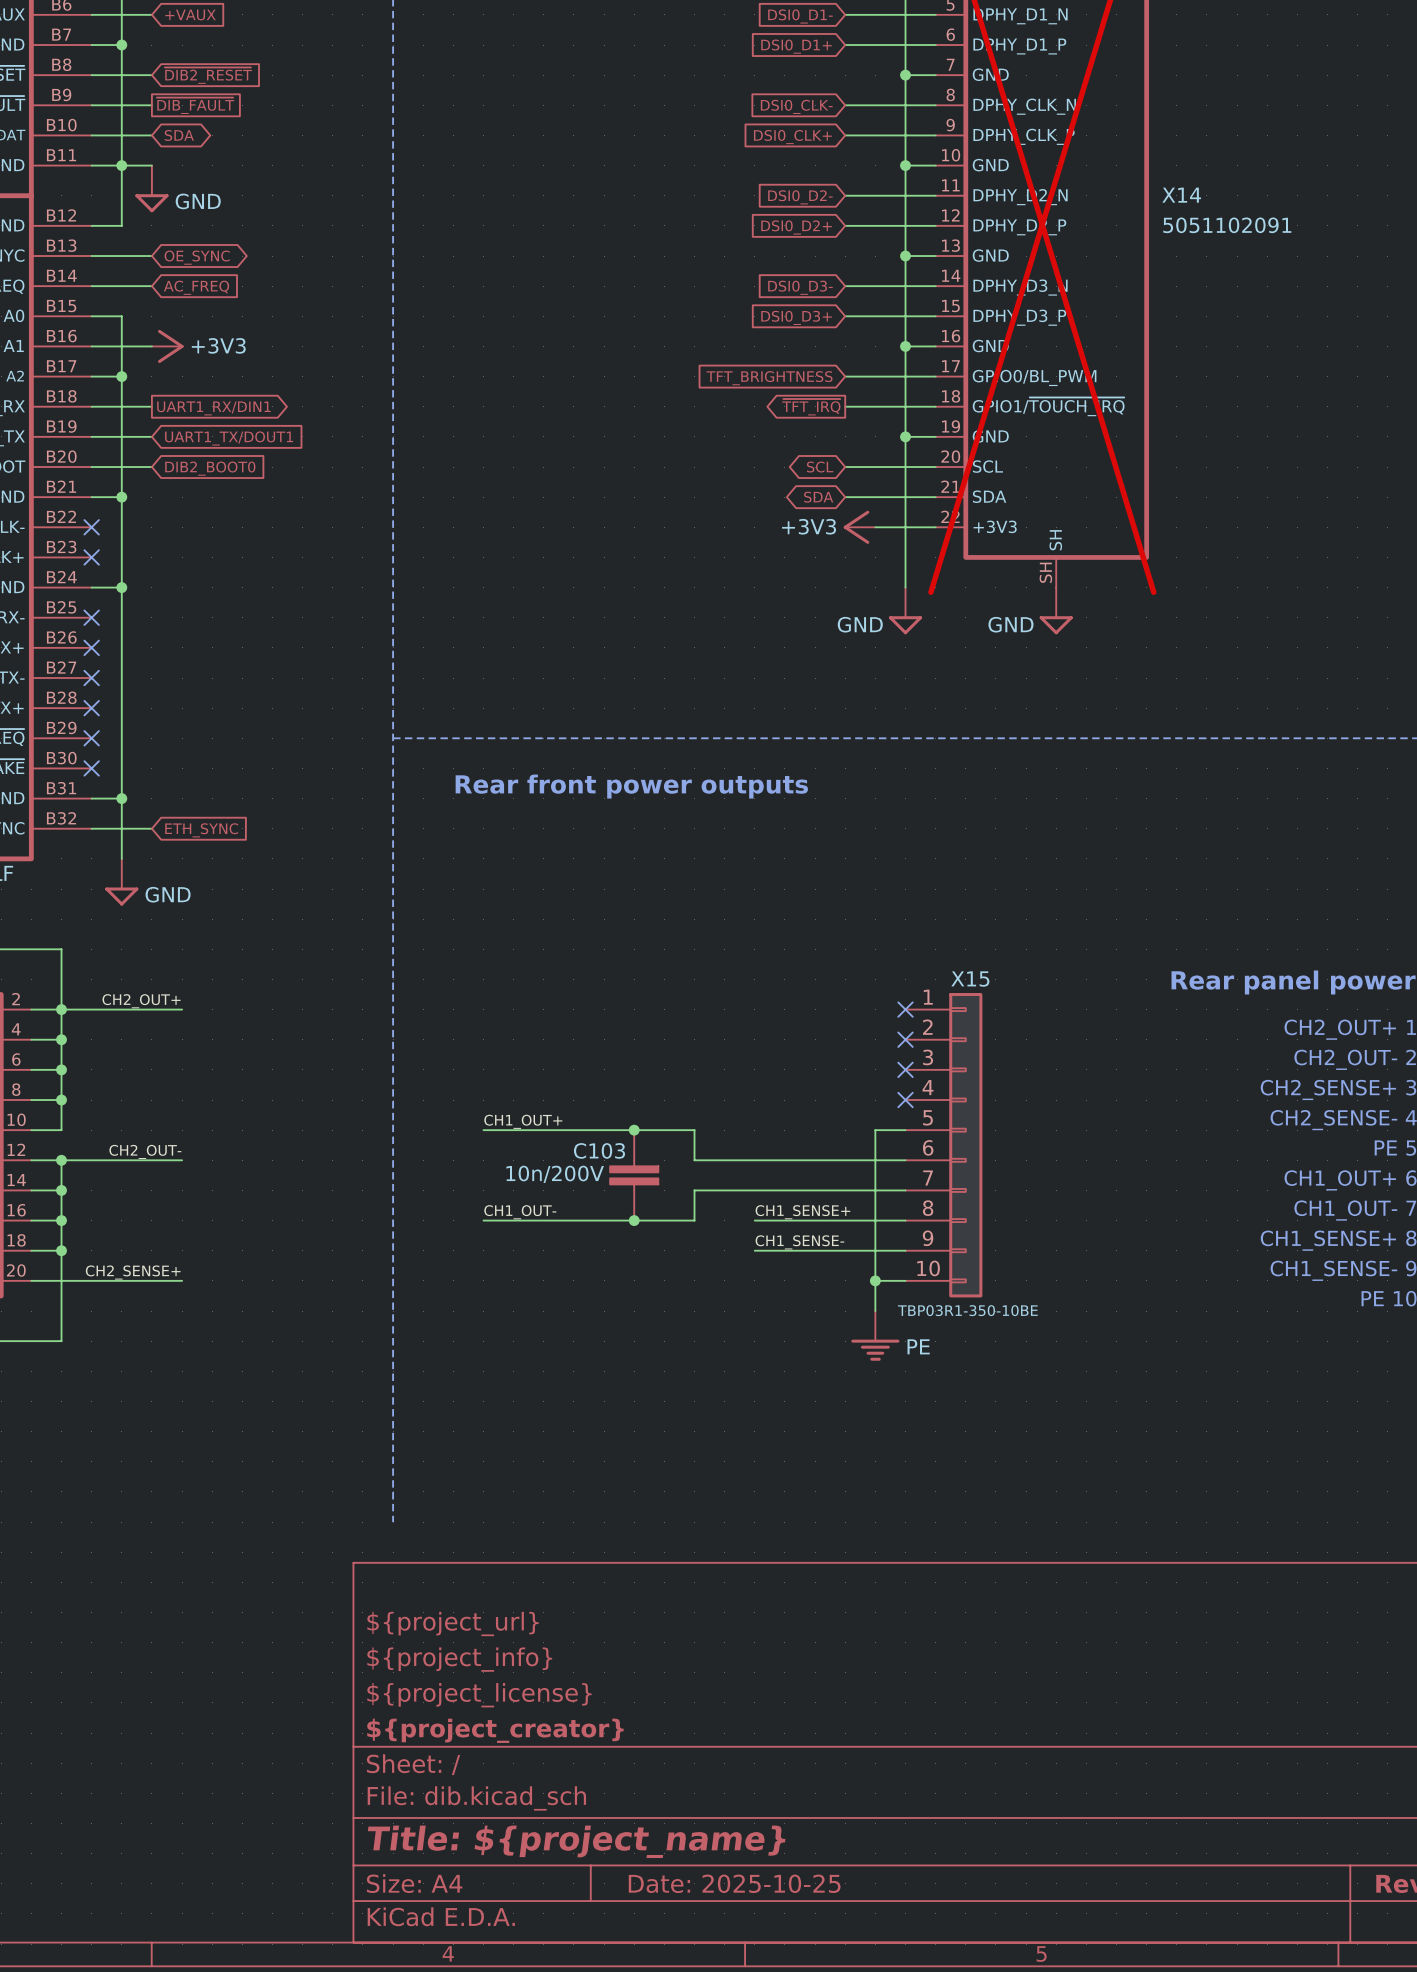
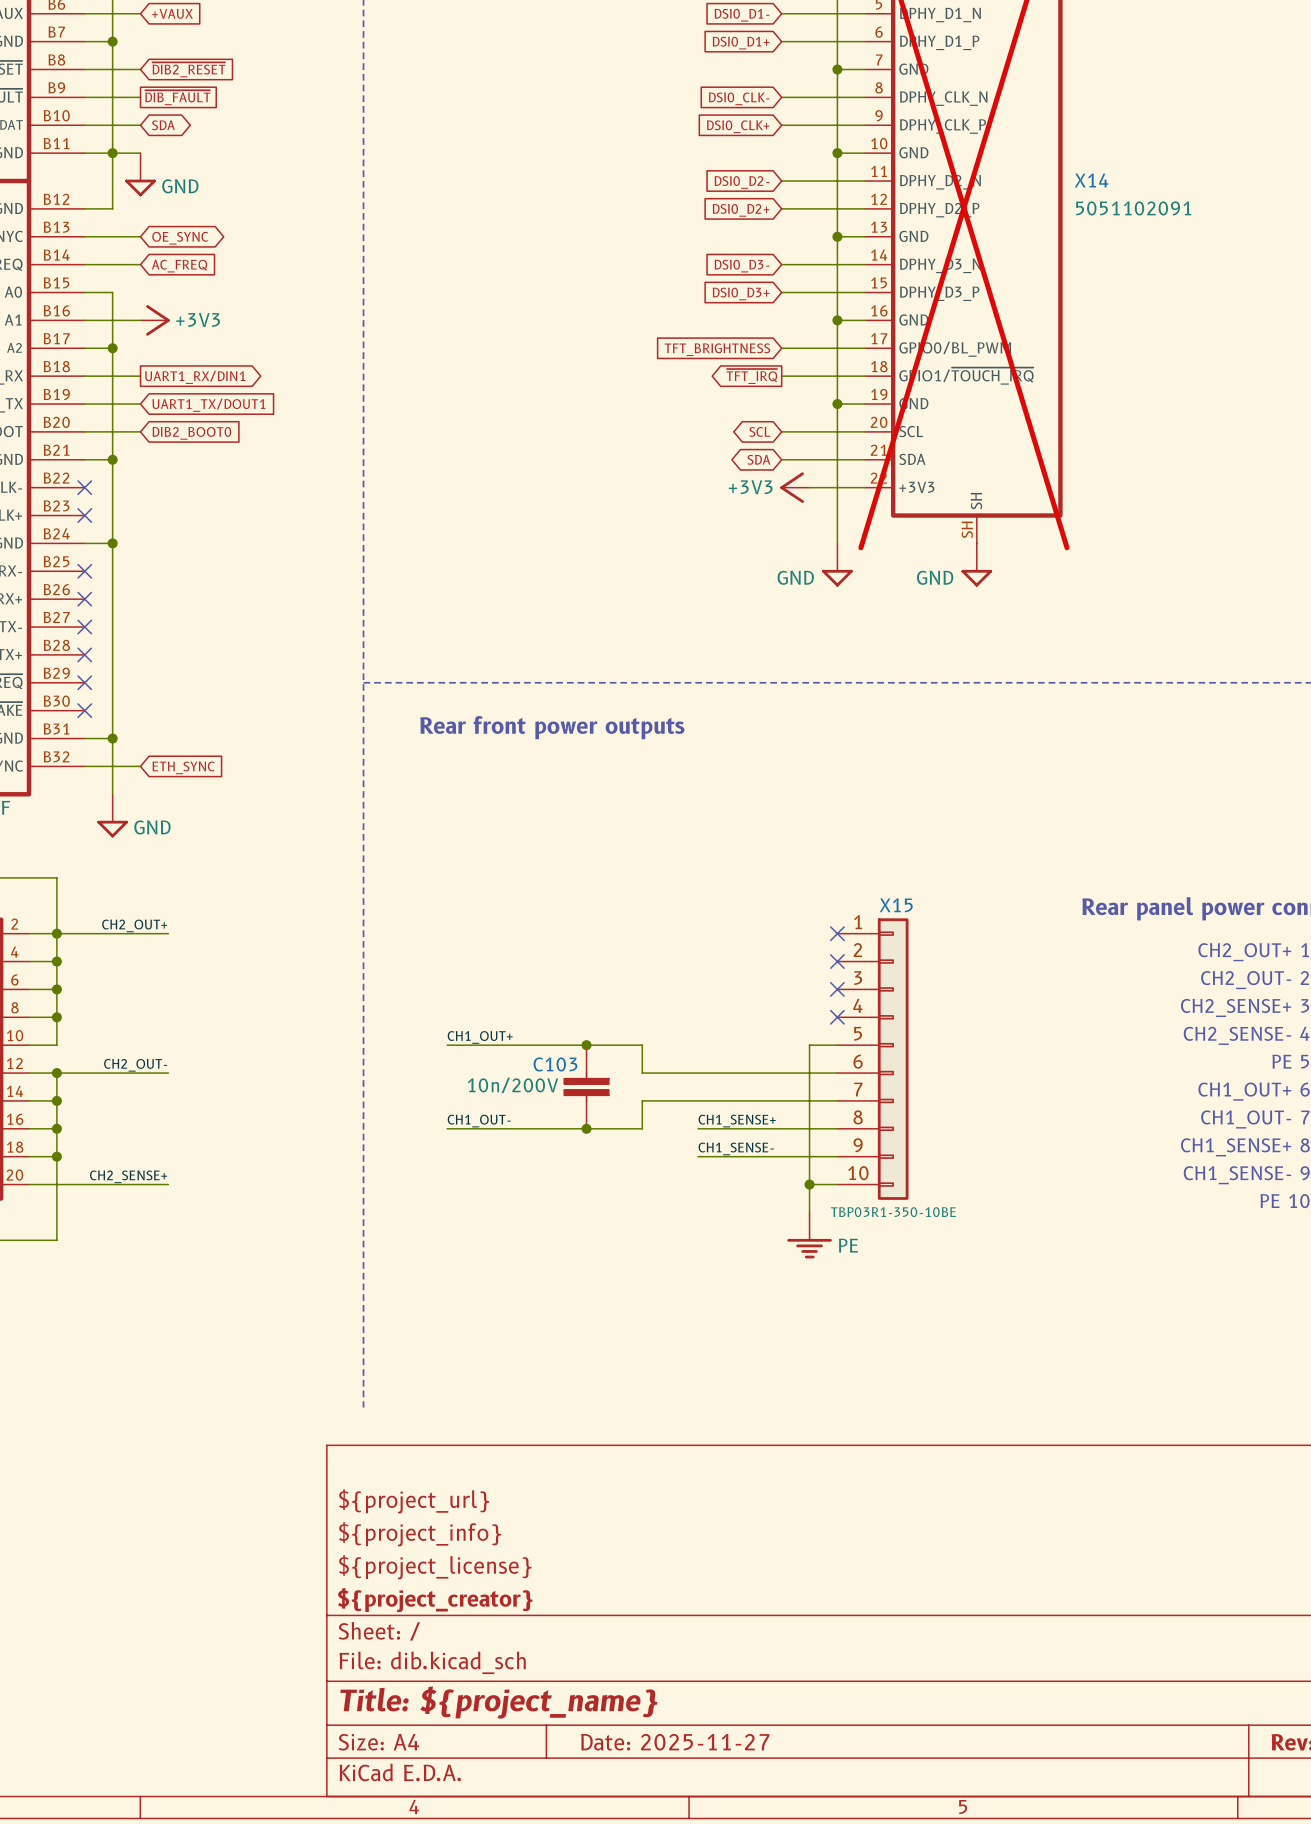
title block: Date: 2025-10-25 (734, 1883) -> Date: 2025-11-27 (675, 1742)

